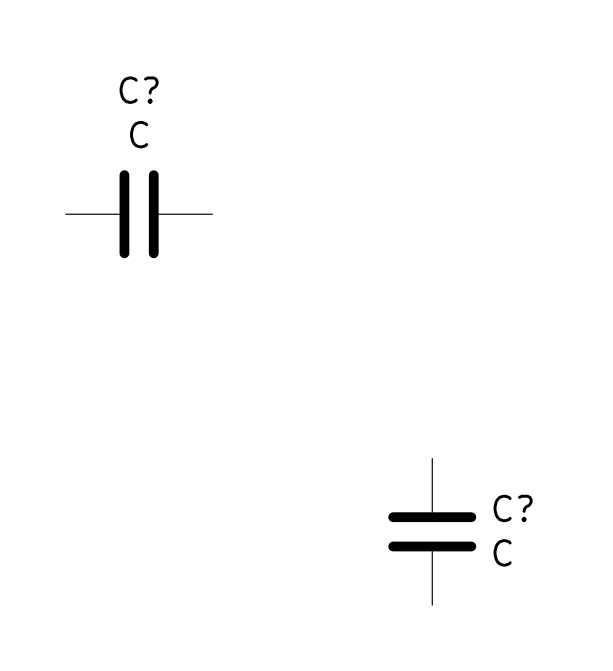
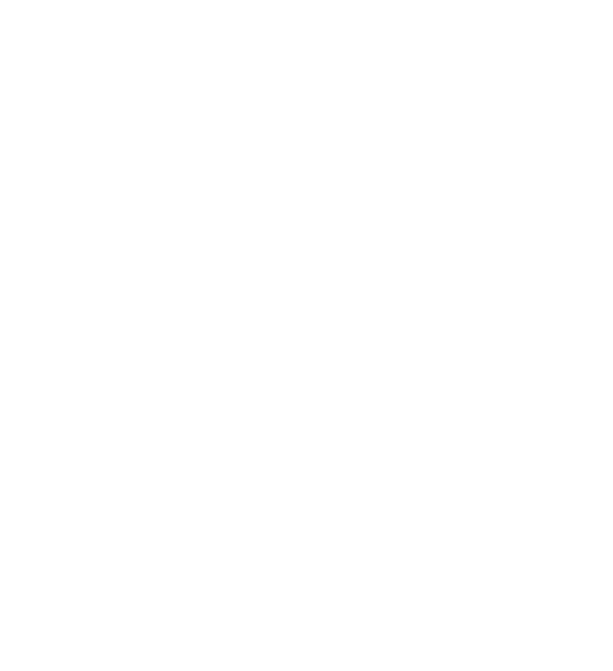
C?: C (139, 214) -> none
C?: C (432, 531) -> none

